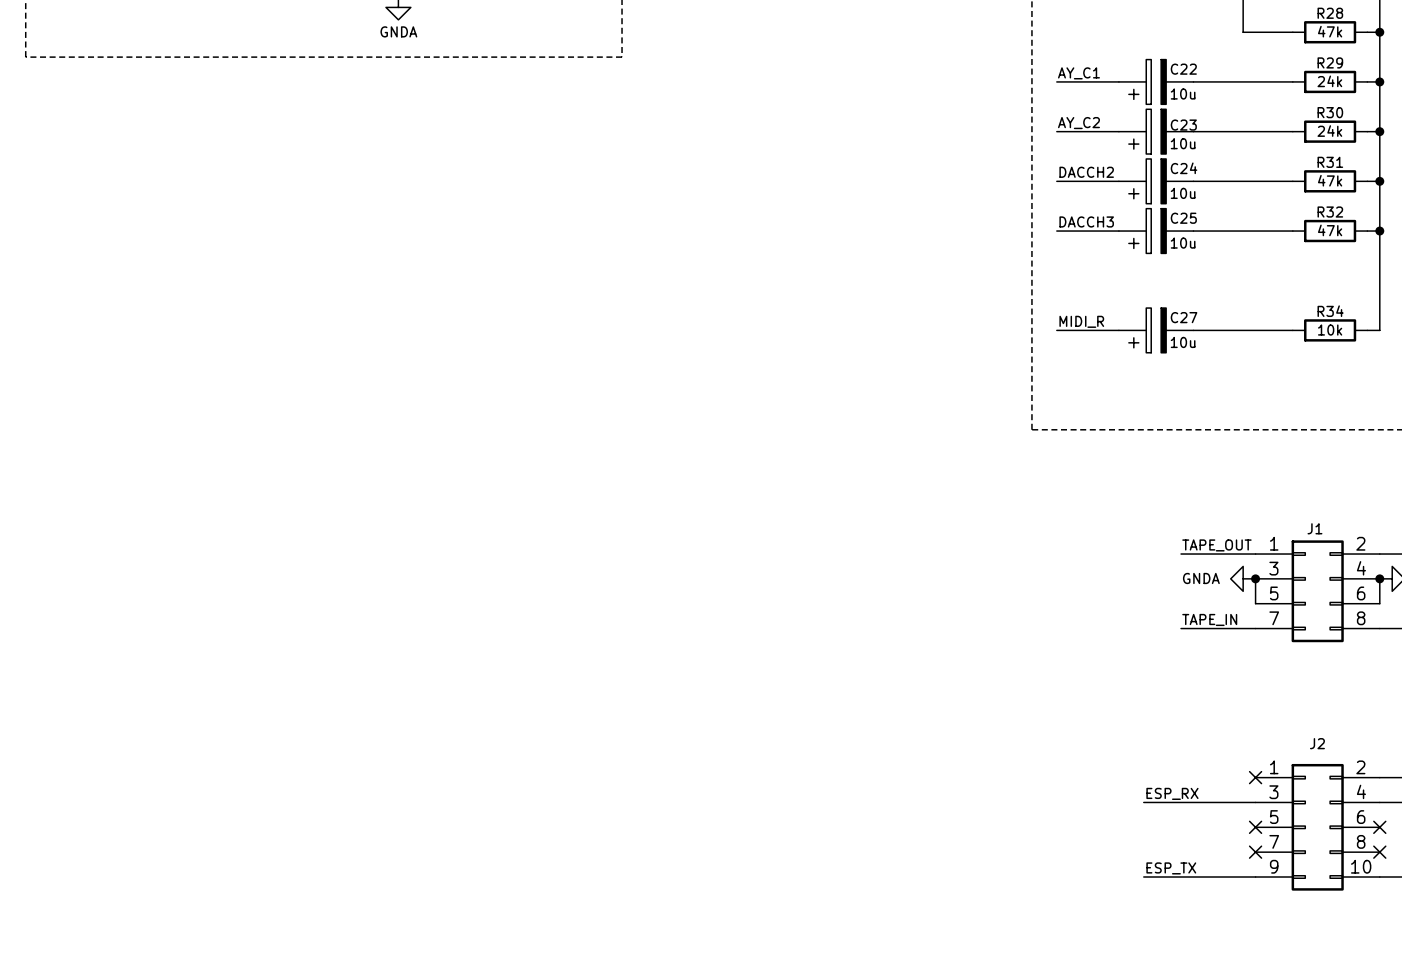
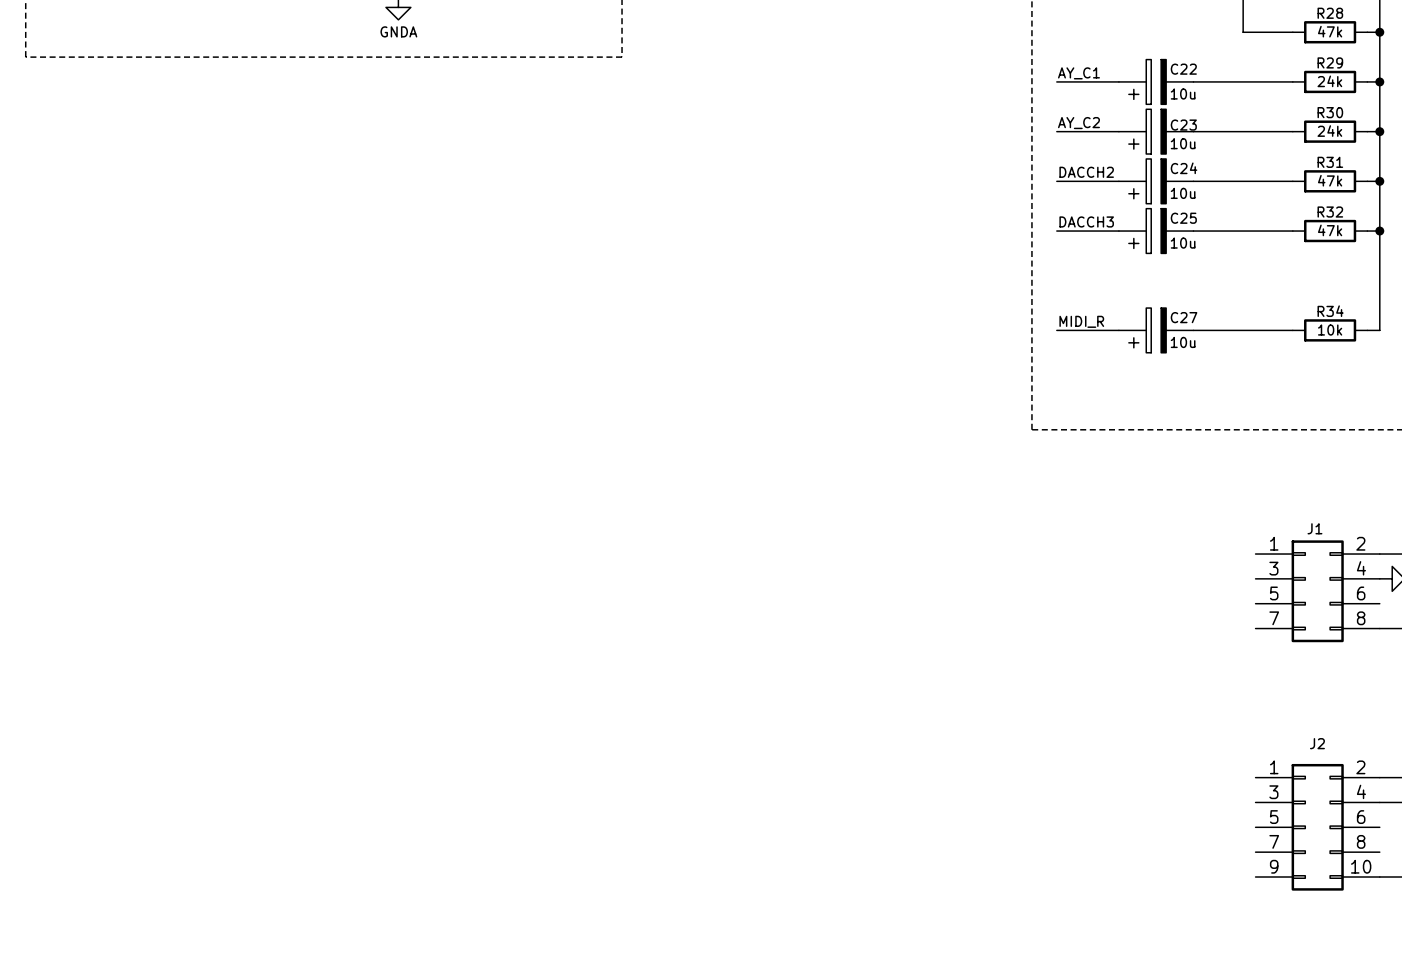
label: TAPE_OUT (1216, 545) -> none
wire: (1181, 554) (1255, 554) -> none
power symbol: GNDA (1243, 578) -> none
wire: (1255, 578) (1255, 603) -> none
junction: (1255, 578) -> none
wire: (1379, 578) (1379, 603) -> none
junction: (1379, 578) -> none
label: TAPE_IN (1209, 619) -> none
wire: (1181, 628) (1255, 628) -> none
no-connect mark: (1255, 777) -> none
label: ESP_RX (1172, 793) -> none
wire: (1143, 802) (1255, 802) -> none
no-connect mark: (1255, 827) -> none
no-connect mark: (1379, 827) -> none
no-connect mark: (1255, 852) -> none
no-connect mark: (1379, 852) -> none
label: ESP_TX (1171, 868) -> none
wire: (1143, 877) (1255, 877) -> none

